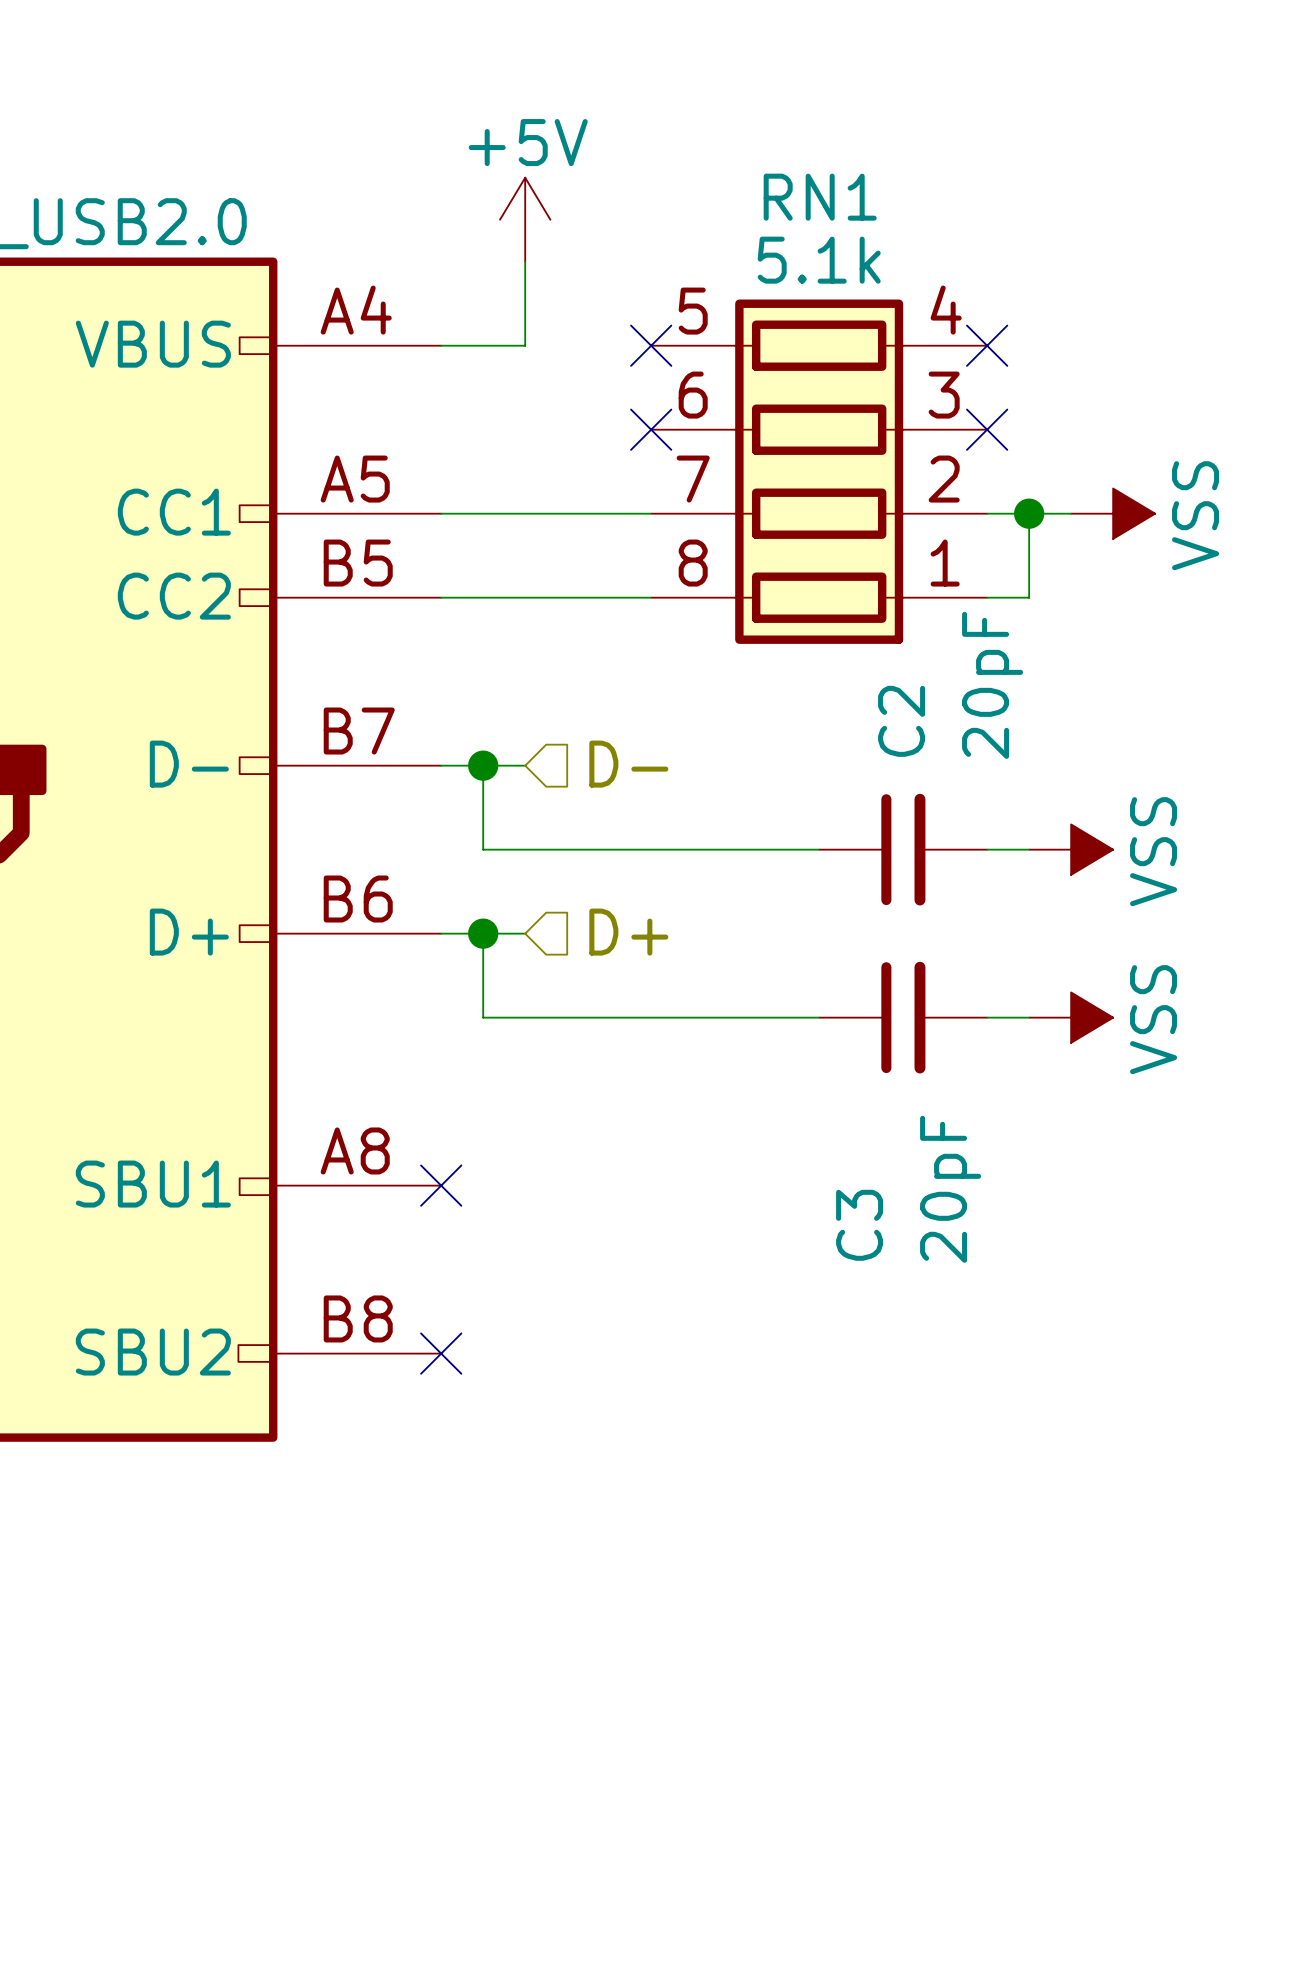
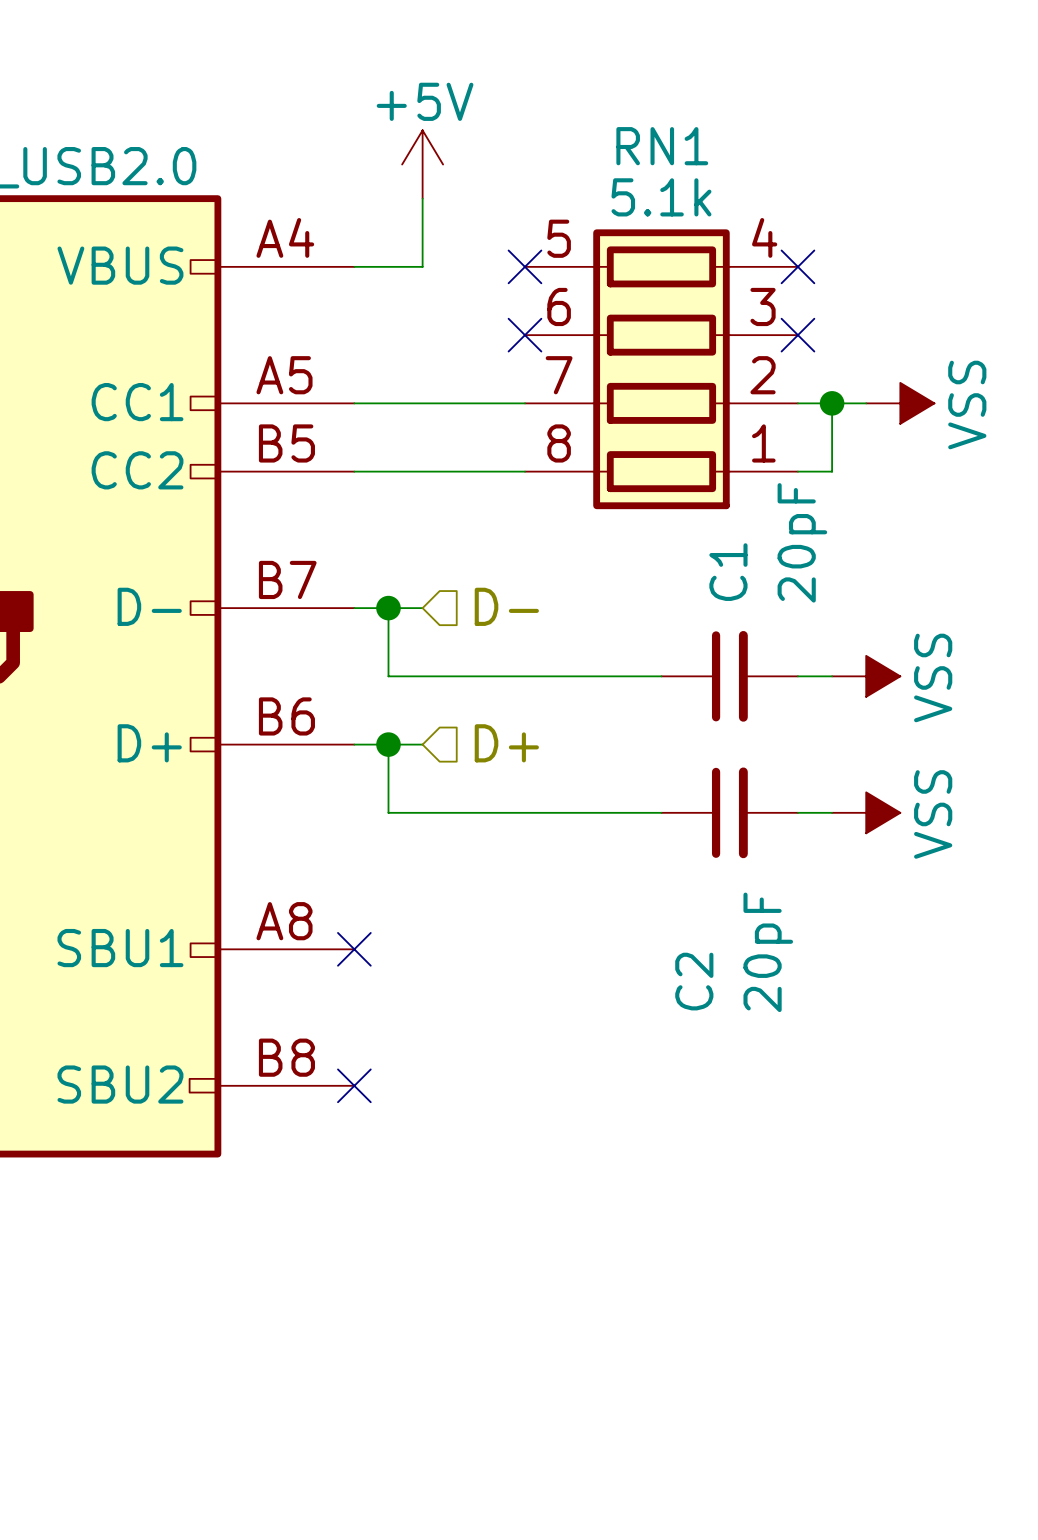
C2 name: C2 (901, 721) -> C1 (728, 572)
C3 name: C3 (859, 1225) -> C2 (694, 981)

